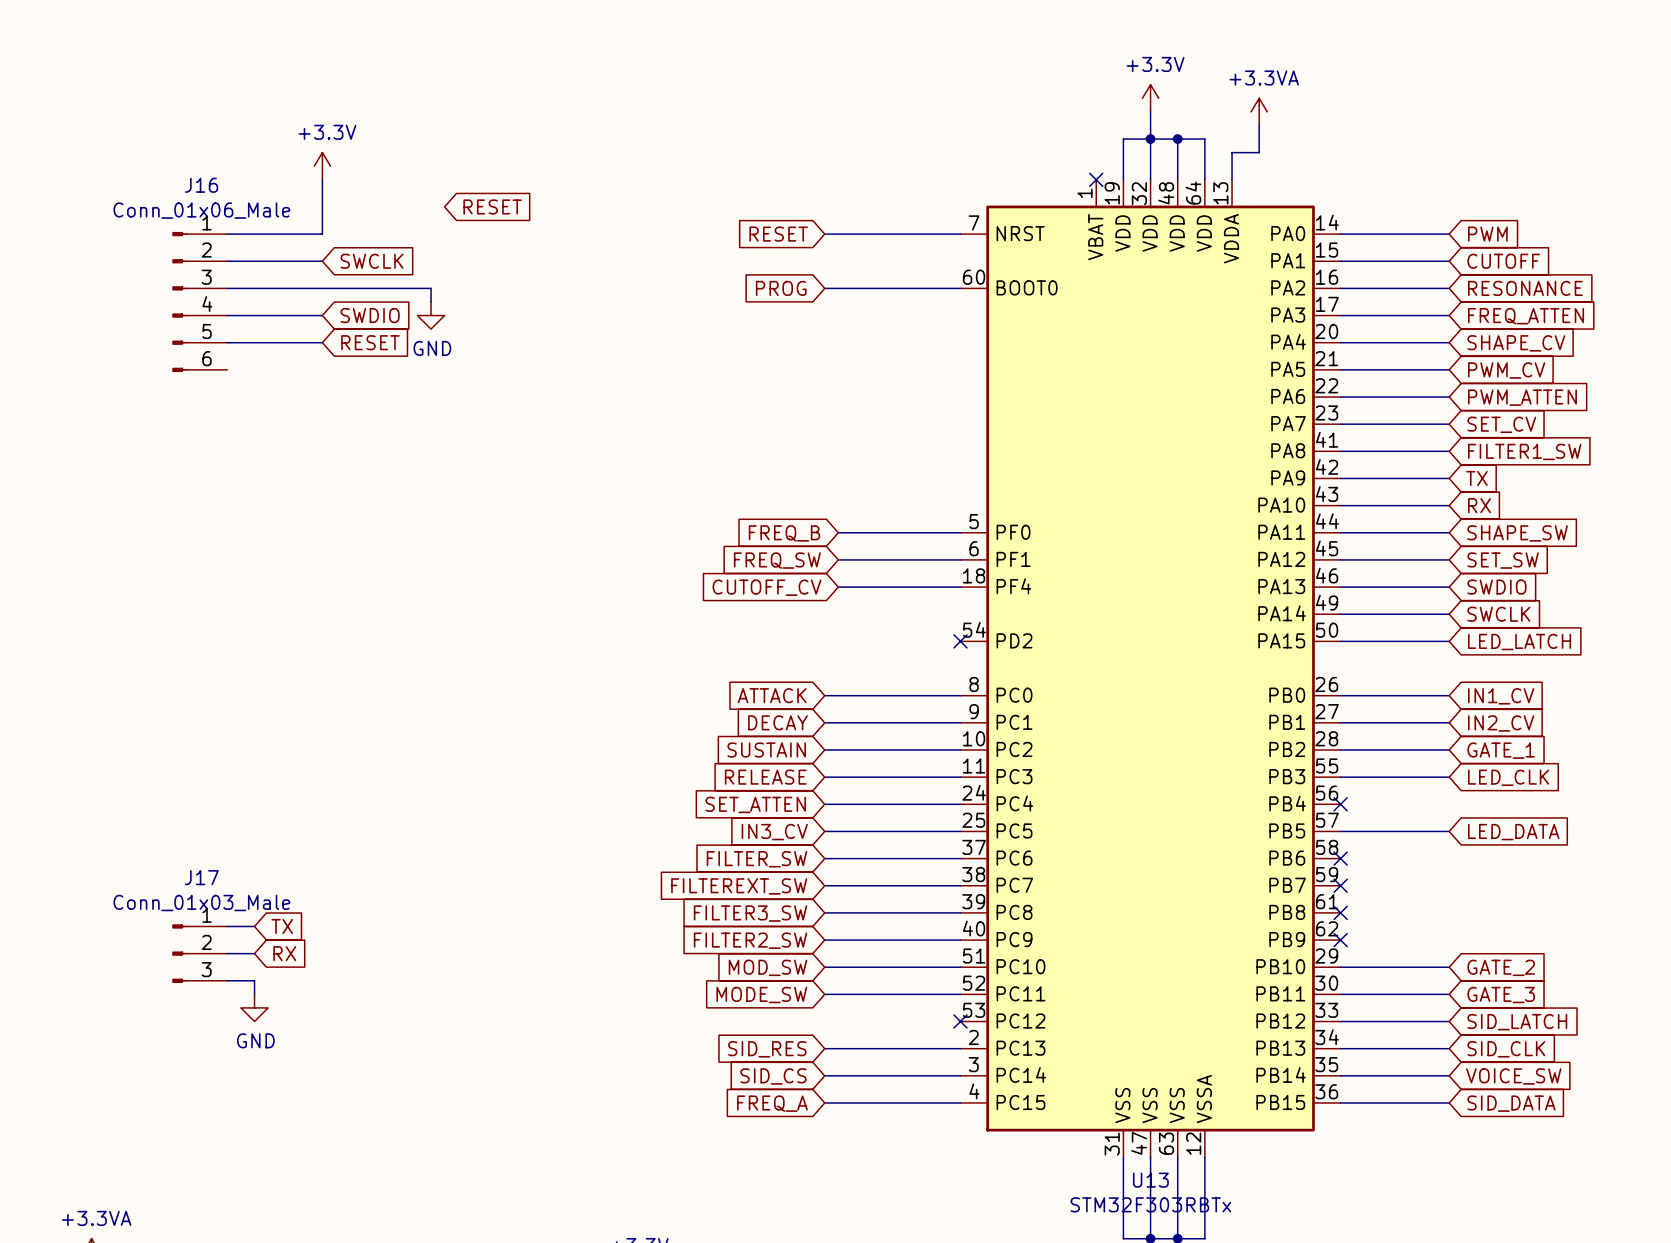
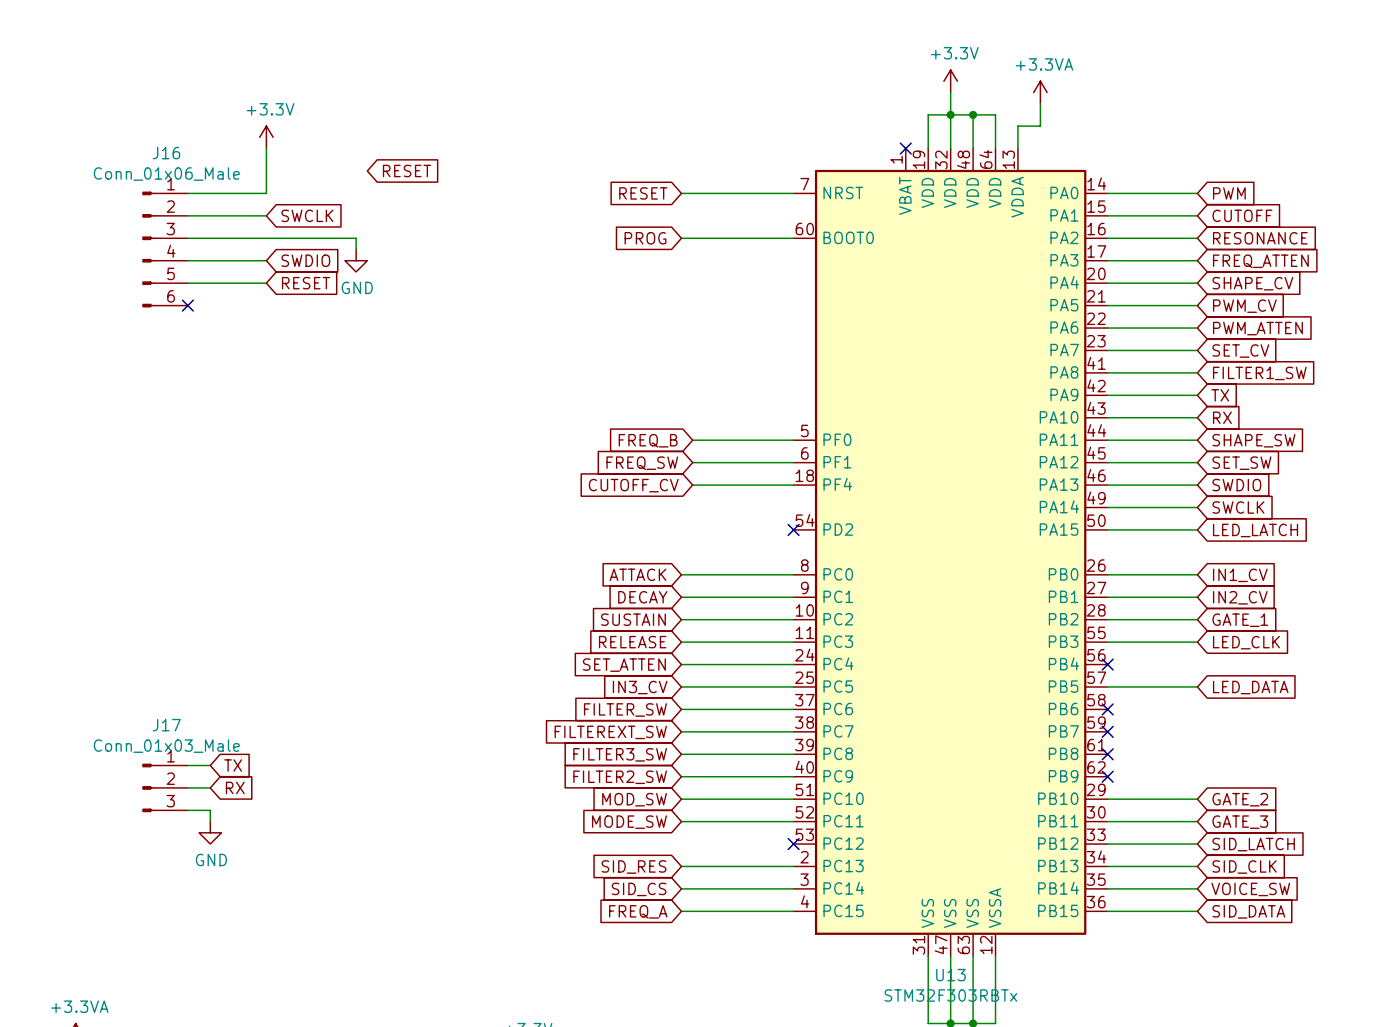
no-connect mark: none -> (187, 305)

